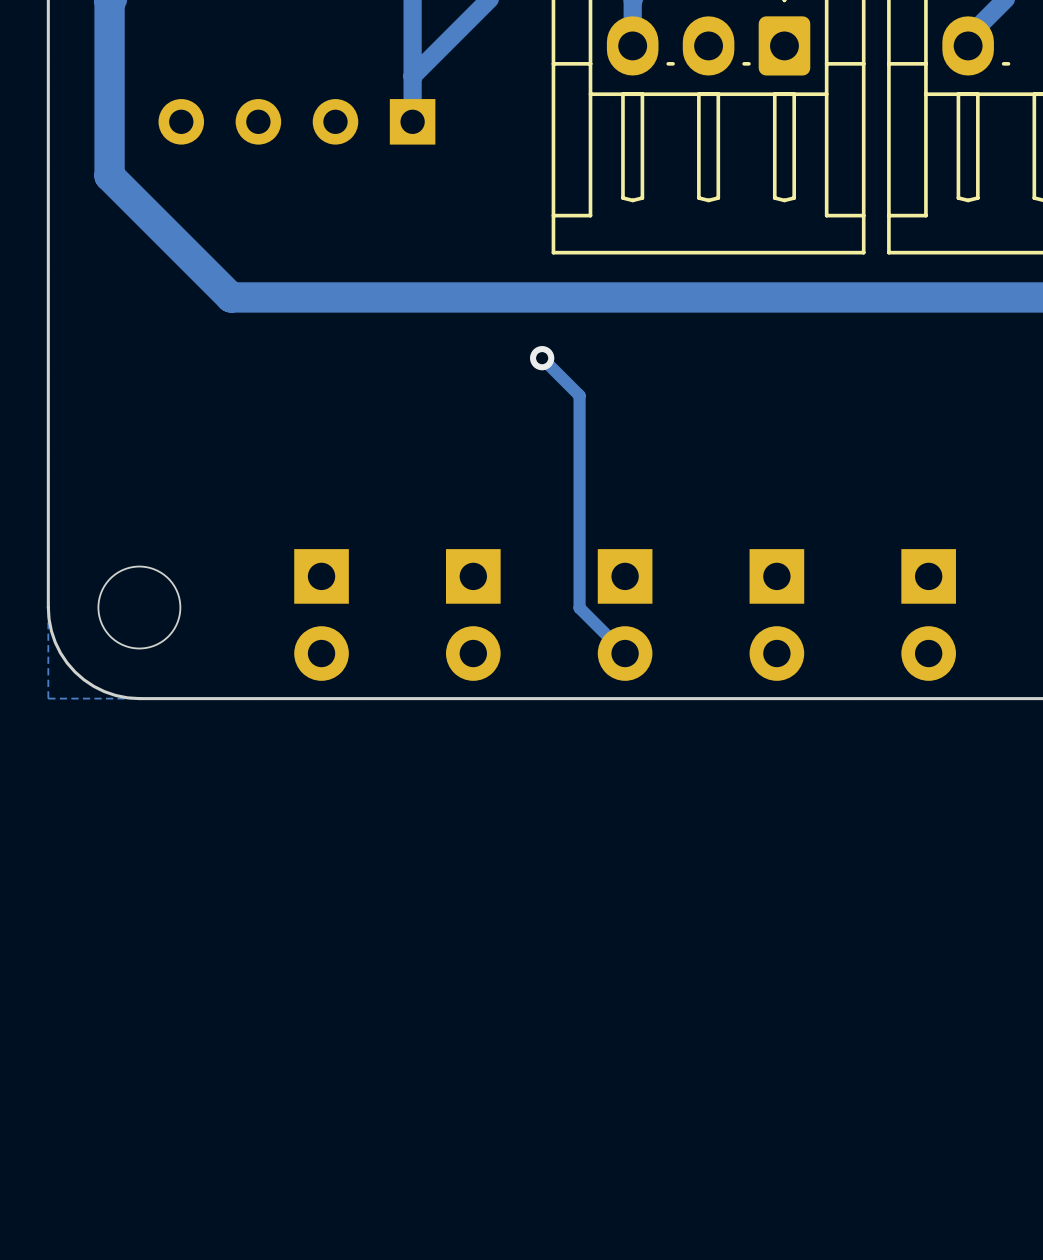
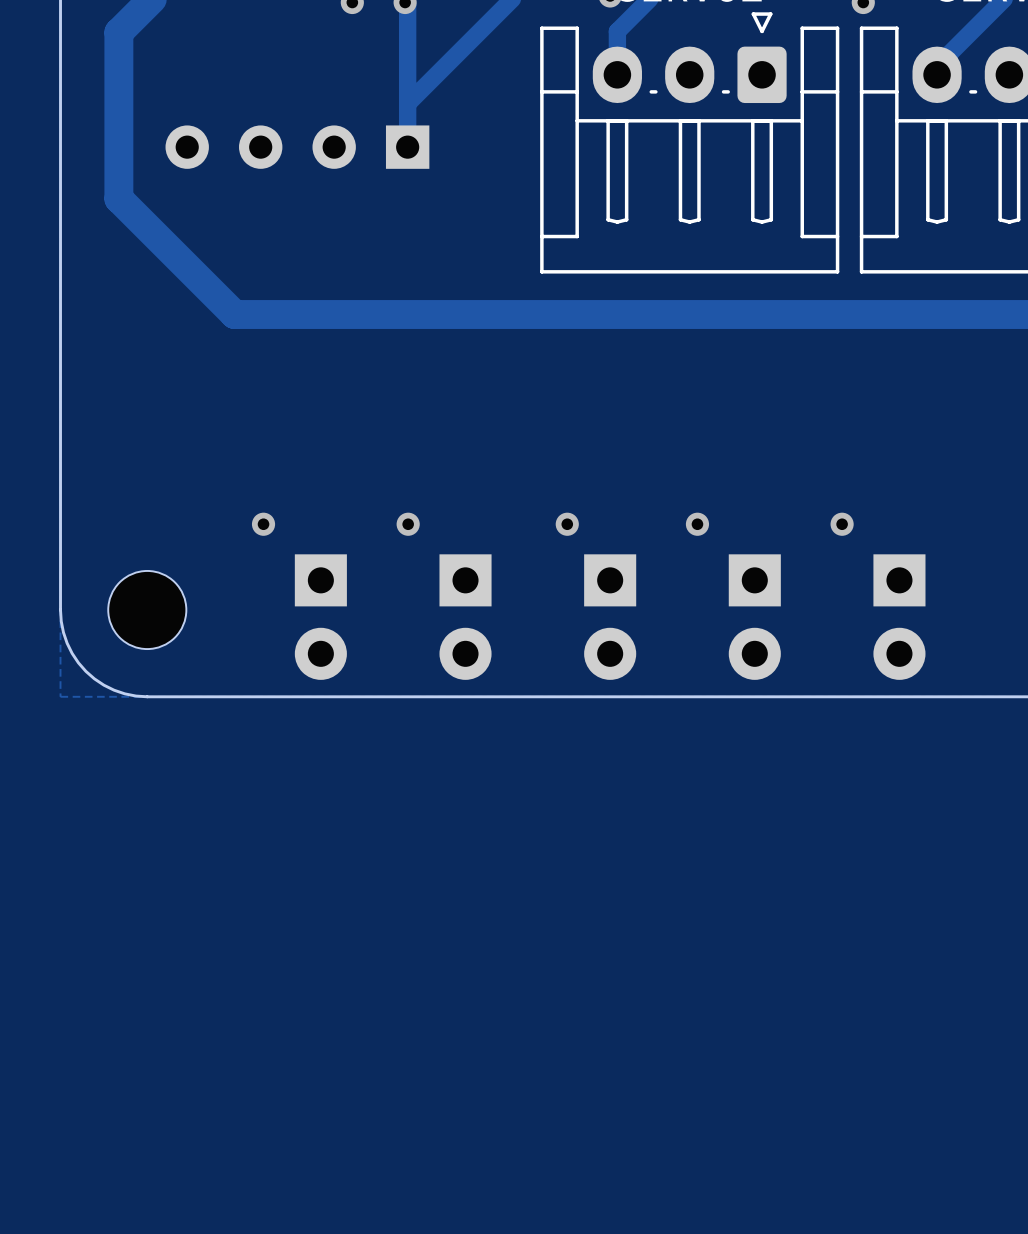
track: (542, 358) (579, 395) (579, 607) (625, 653) -> none
via: (542, 358) -> none
via: none -> (263, 524)
via: none -> (408, 524)
via: none -> (567, 524)
via: none -> (697, 524)
via: none -> (842, 524)

